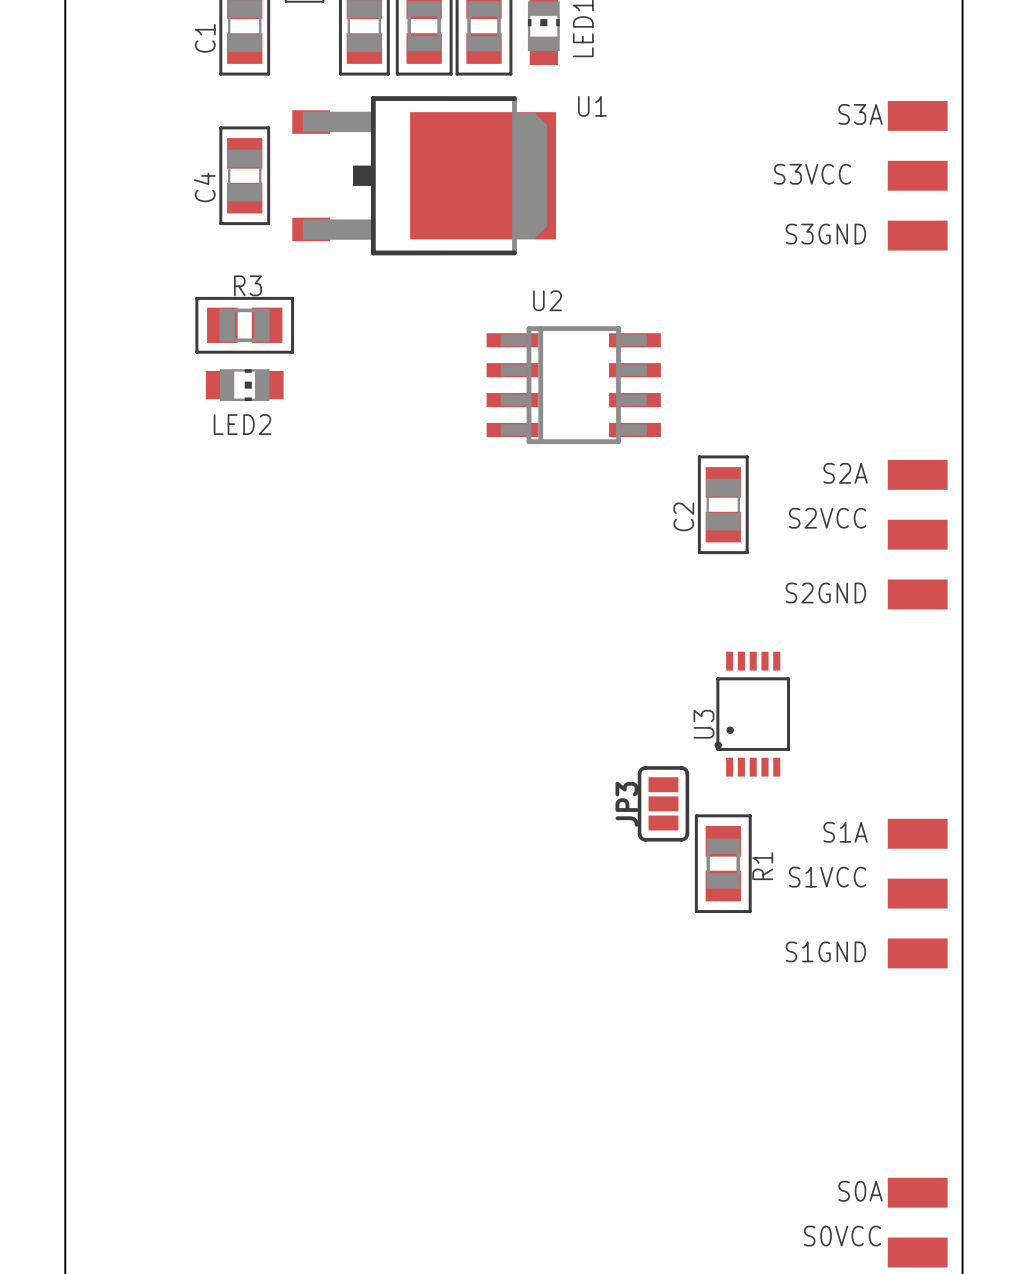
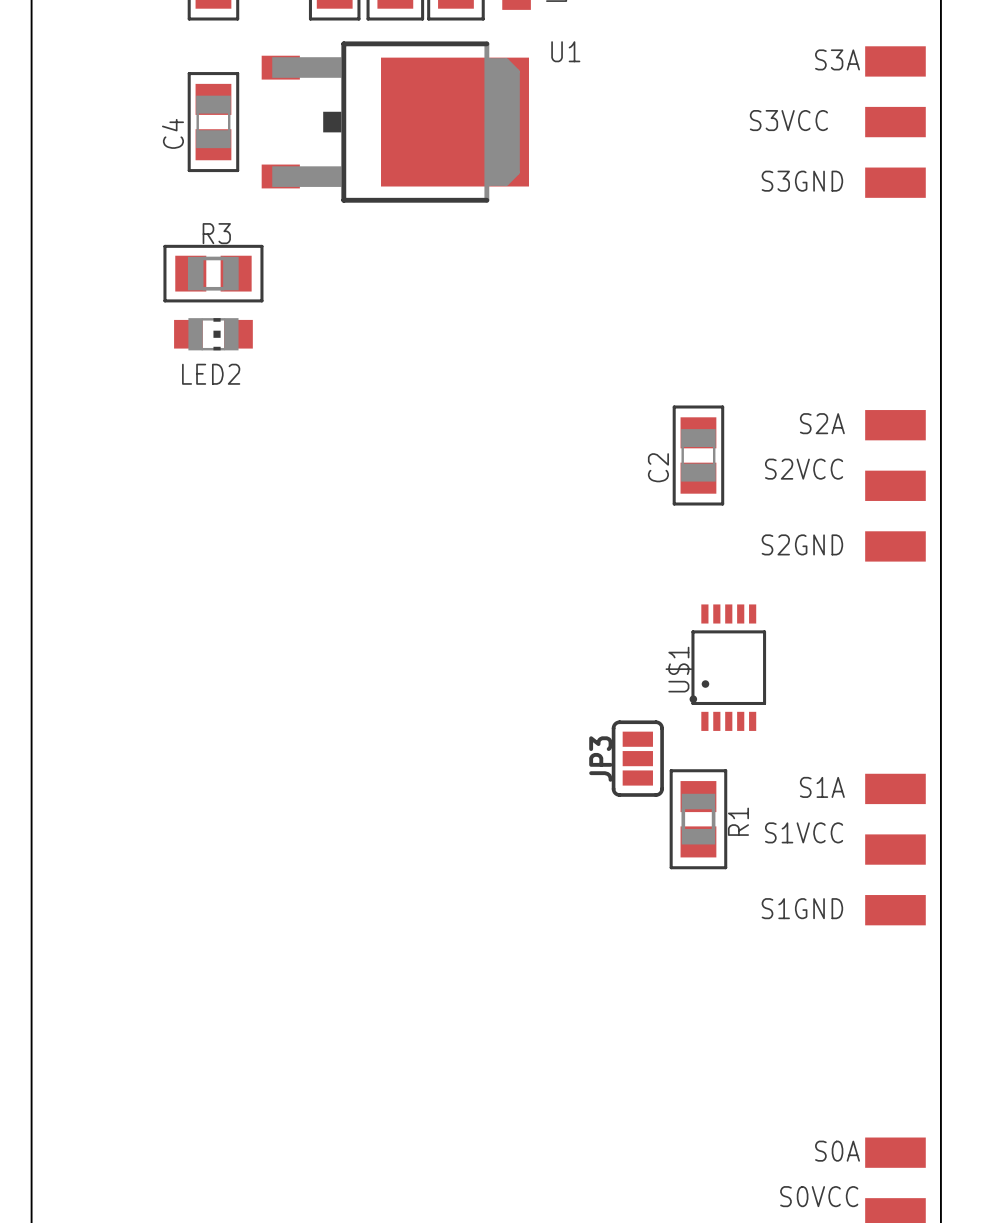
U2: (573, 385) -> none
U3 name: U3 (703, 724) -> U$1 (678, 669)

